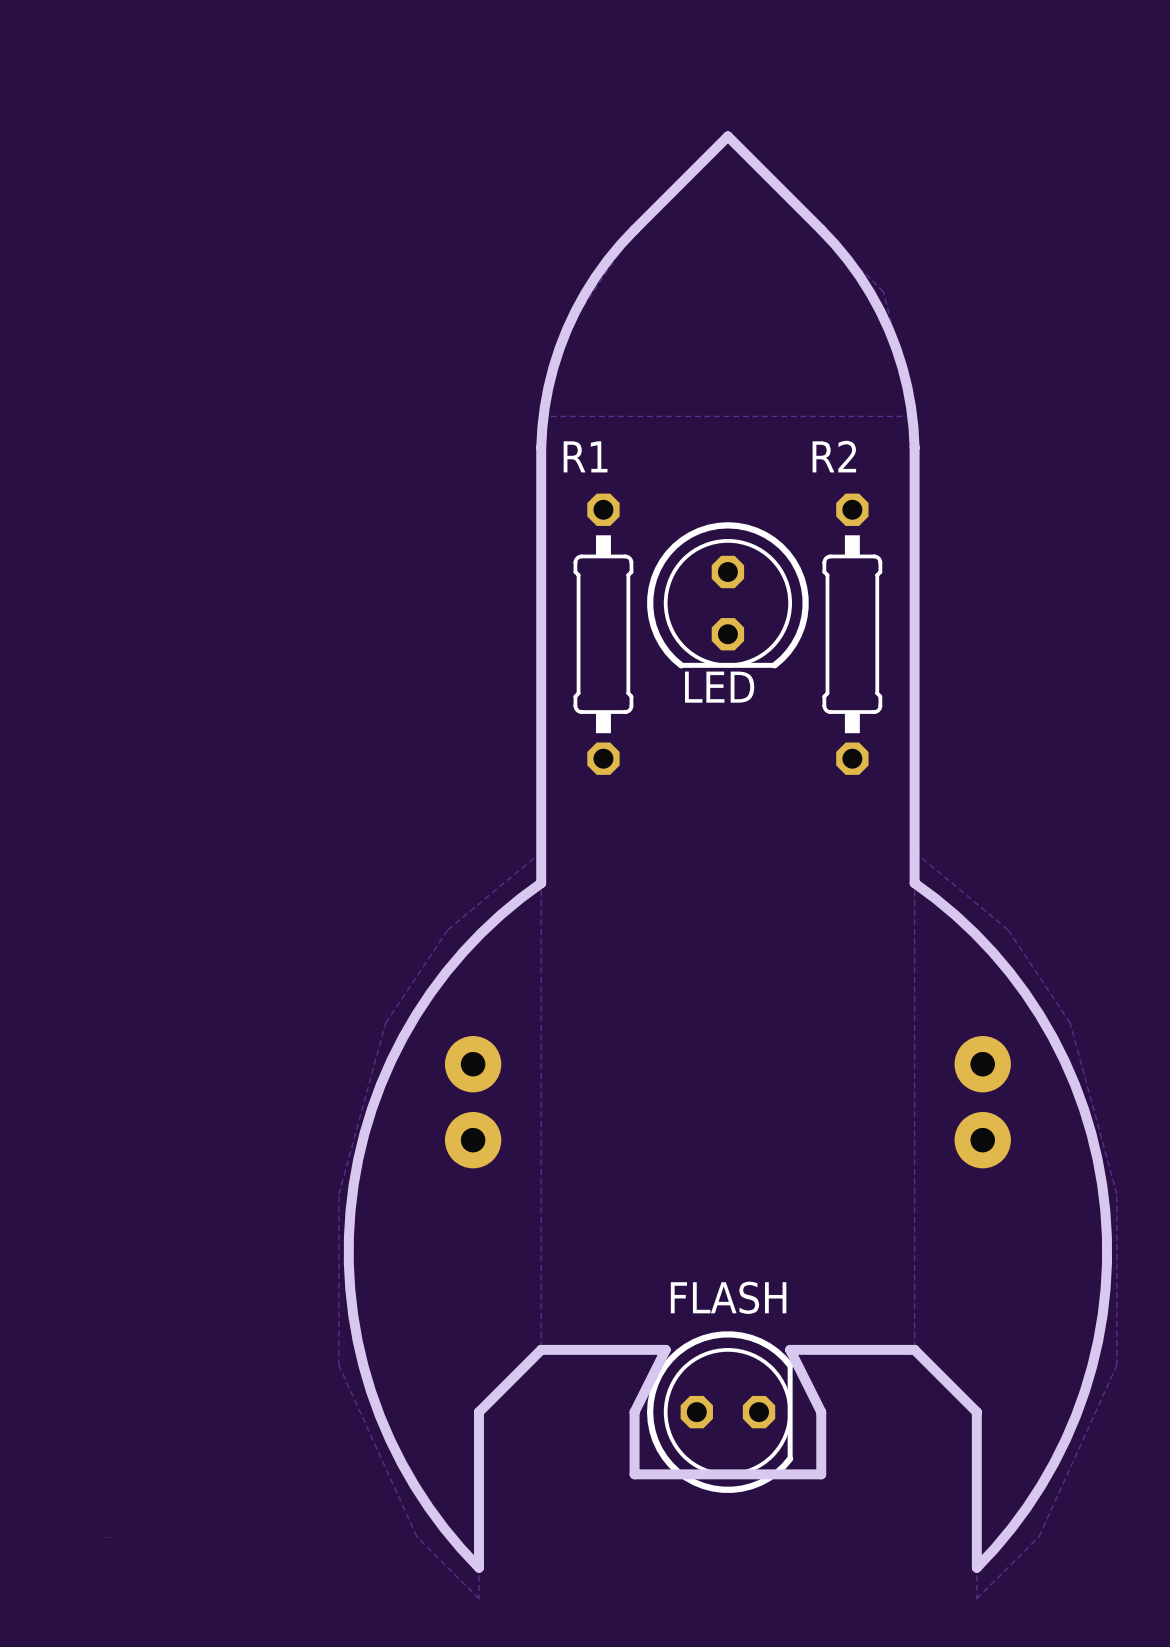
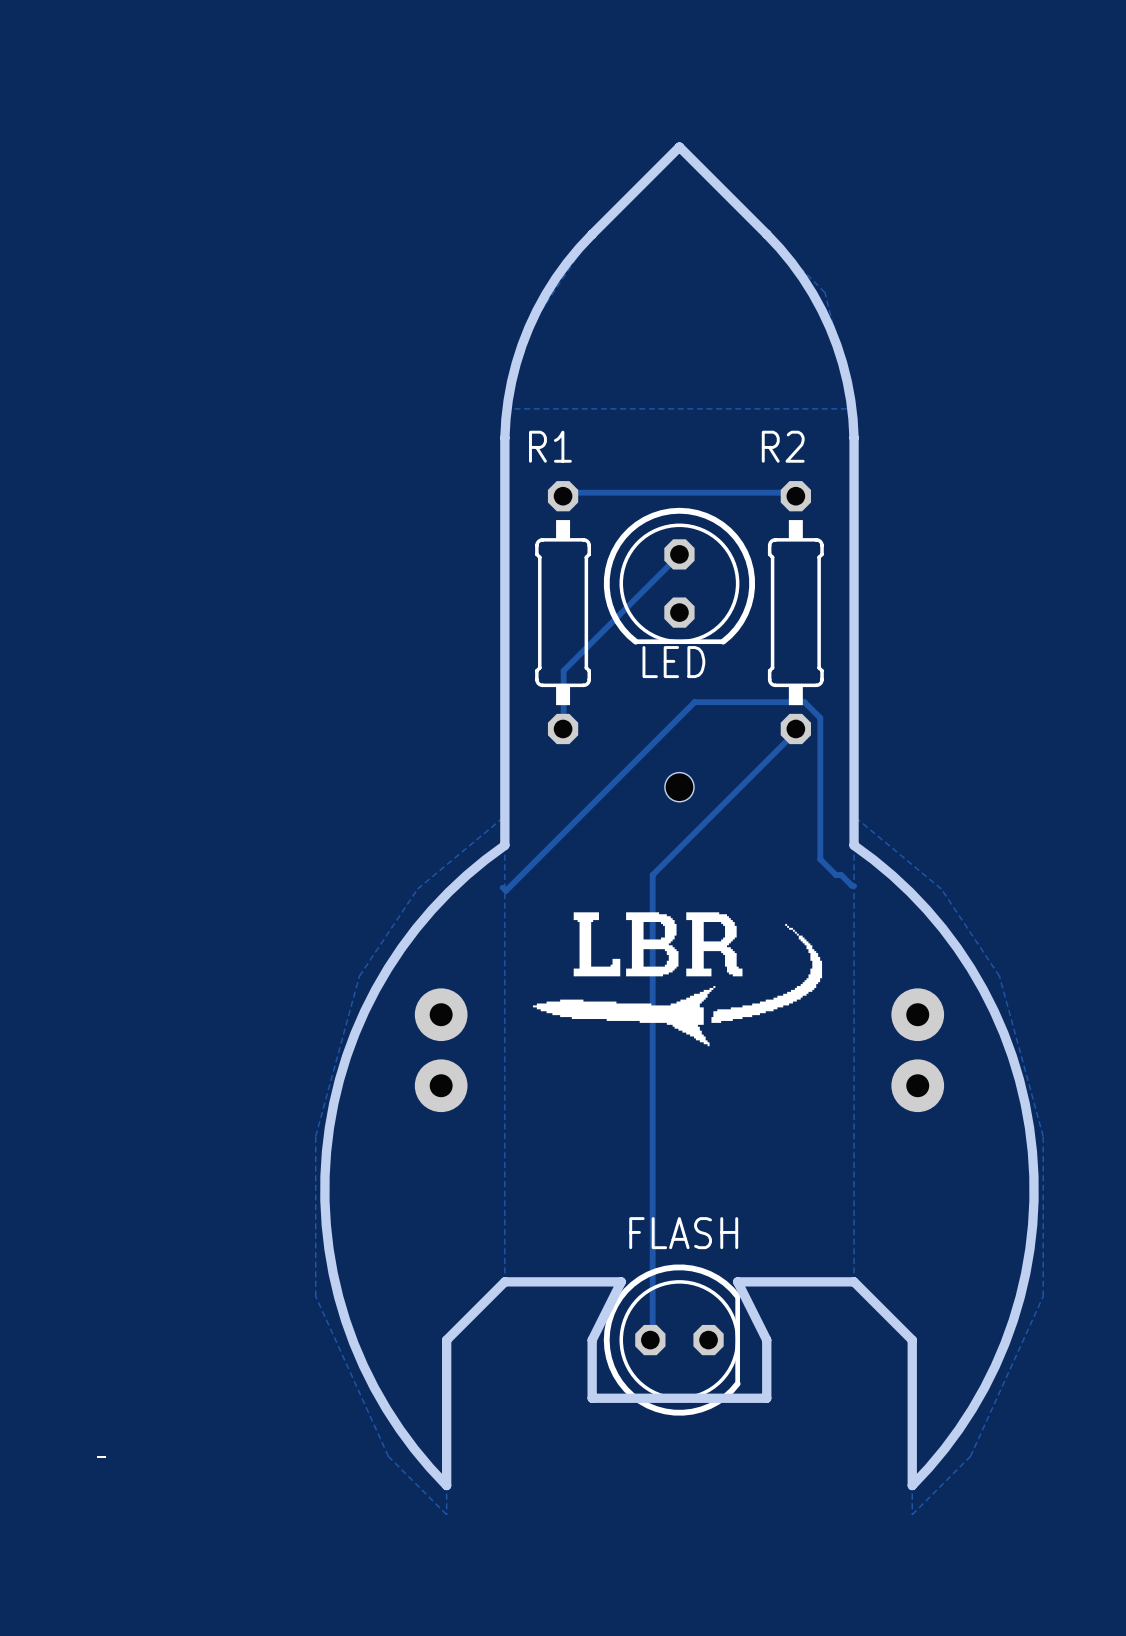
track: none -> (563, 496) (563, 492) (794, 492) (795, 496)
track: none -> (679, 554) (563, 670) (563, 728)
track: none -> (795, 728) (794, 733) (652, 875) (652, 1335) (650, 1340)
hole: none -> (679, 787)
track: none -> (854, 886) (841, 875) (836, 875) (820, 859) (820, 717) (804, 702) (694, 702) (506, 890) (502, 887)
drawing: none -> [532, 912, 823, 1047]

